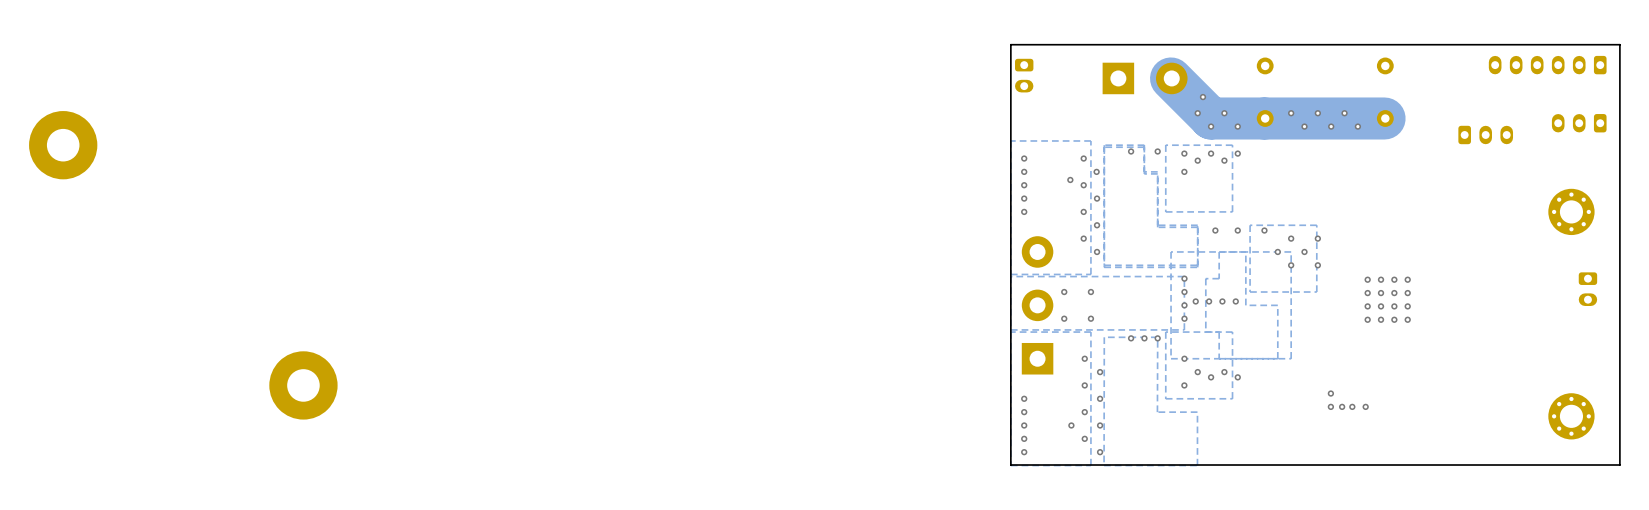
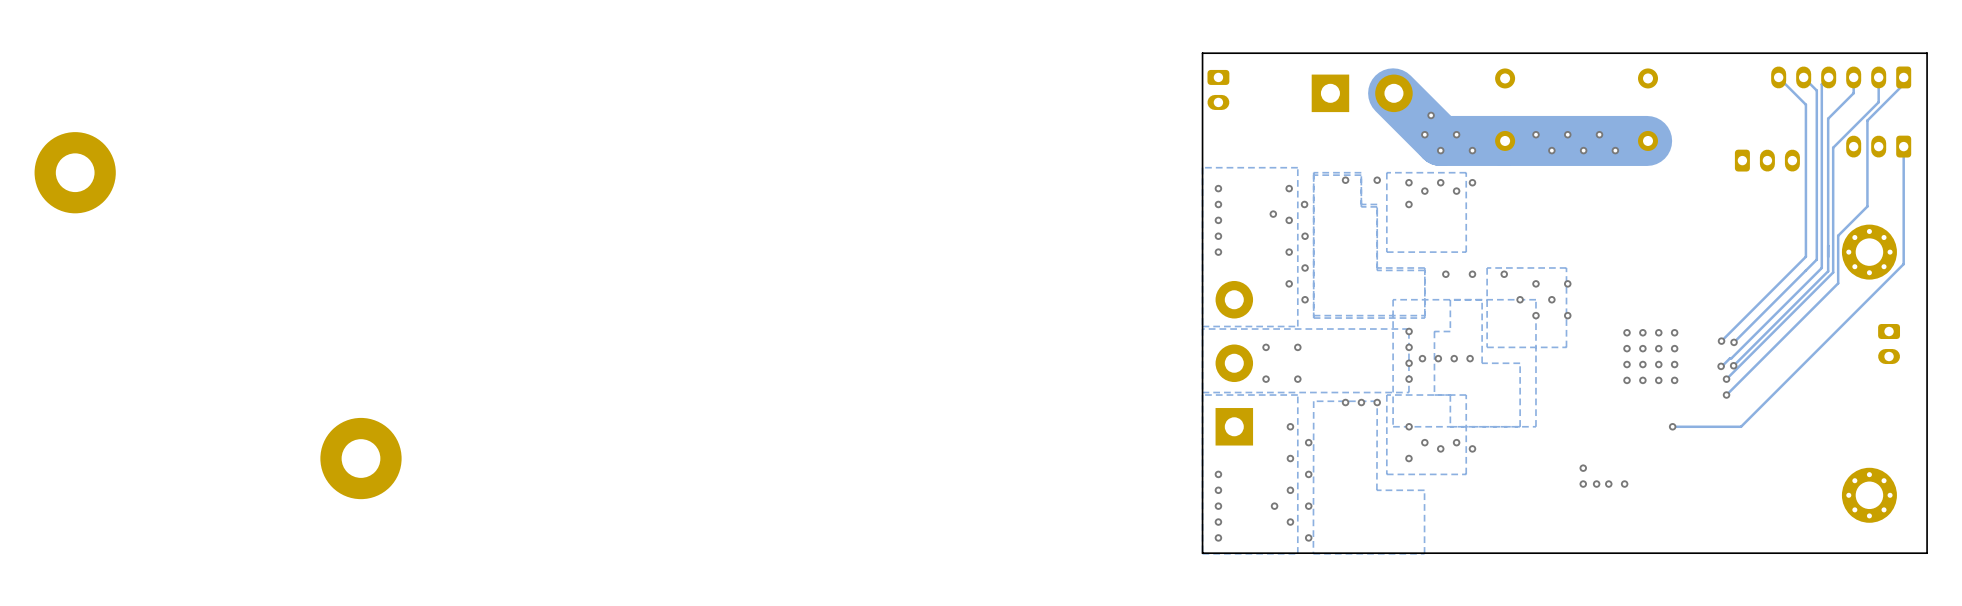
track: none -> (1778, 77) (1805, 104) (1805, 256) (1721, 341)
track: none -> (1803, 77) (1816, 90) (1816, 259) (1734, 342)
track: none -> (1828, 77) (1821, 84) (1821, 267) (1723, 366) (1721, 366)
track: none -> (1853, 77) (1853, 93) (1828, 118) (1828, 271) (1733, 365)
track: none -> (1878, 77) (1878, 102) (1833, 147) (1833, 272) (1726, 378)
track: none -> (1903, 77) (1903, 84) (1867, 120) (1867, 206) (1838, 235) (1838, 283) (1726, 395)
track: none -> (1903, 146) (1903, 264) (1741, 426) (1672, 426)
via: none -> (1721, 341)
via: none -> (1734, 342)
via: none -> (1721, 366)
via: none -> (1733, 365)
via: none -> (1726, 379)
via: none -> (1726, 395)
via: none -> (1672, 426)

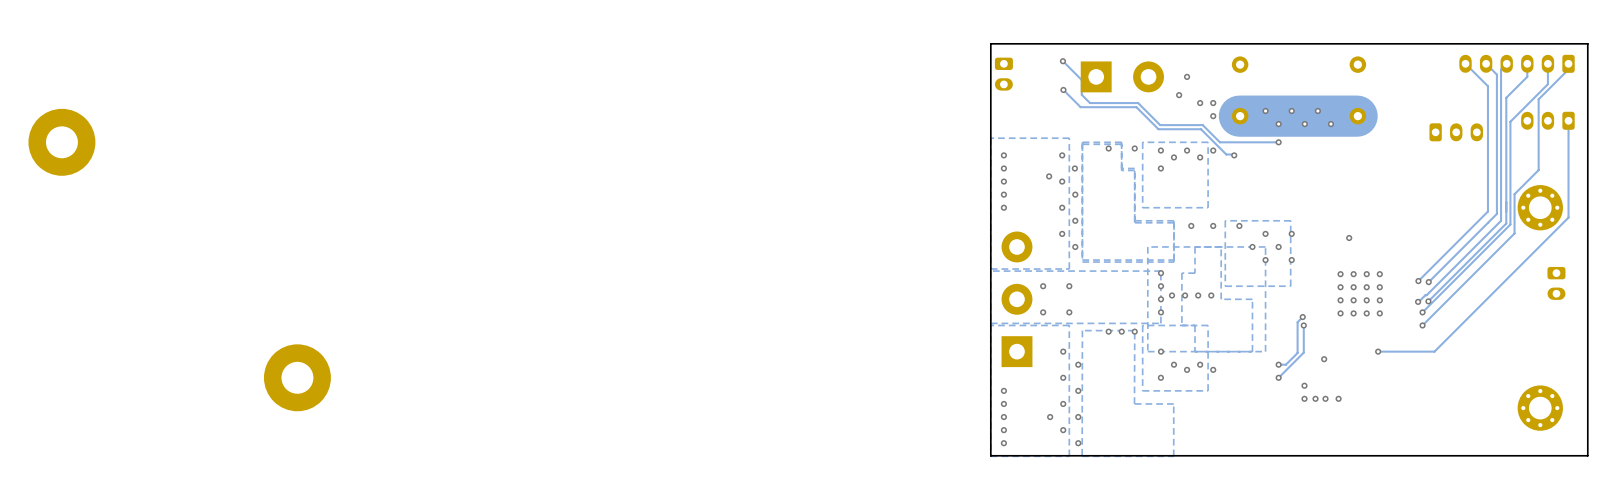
track: none -> (1062, 61) (1081, 80) (1081, 94) (1090, 103) (1138, 103) (1160, 125) (1202, 125) (1219, 142) (1278, 142)
via: none -> (1062, 61)
track: (1393, 93) (1440, 140) (1504, 140) -> none
via: none -> (1187, 76)
track: none -> (1063, 89) (1080, 107) (1136, 107) (1158, 129) (1201, 129) (1226, 154) (1234, 155)
via: none -> (1063, 89)
via: none -> (1200, 103)
via: none -> (1213, 103)
via: (1424, 134) -> none
via: (1456, 134) -> none
via: none -> (1213, 116)
via: (1440, 150) -> none
via: (1472, 150) -> none
via: none -> (1278, 142)
via: none -> (1234, 155)
via: none -> (1349, 238)
track: none -> (1302, 317) (1297, 322) (1297, 353) (1285, 364) (1278, 364)
via: none -> (1302, 317)
track: none -> (1303, 325) (1303, 352) (1278, 377)
via: none -> (1303, 325)
via: none -> (1324, 359)
via: none -> (1278, 364)
via: none -> (1278, 377)

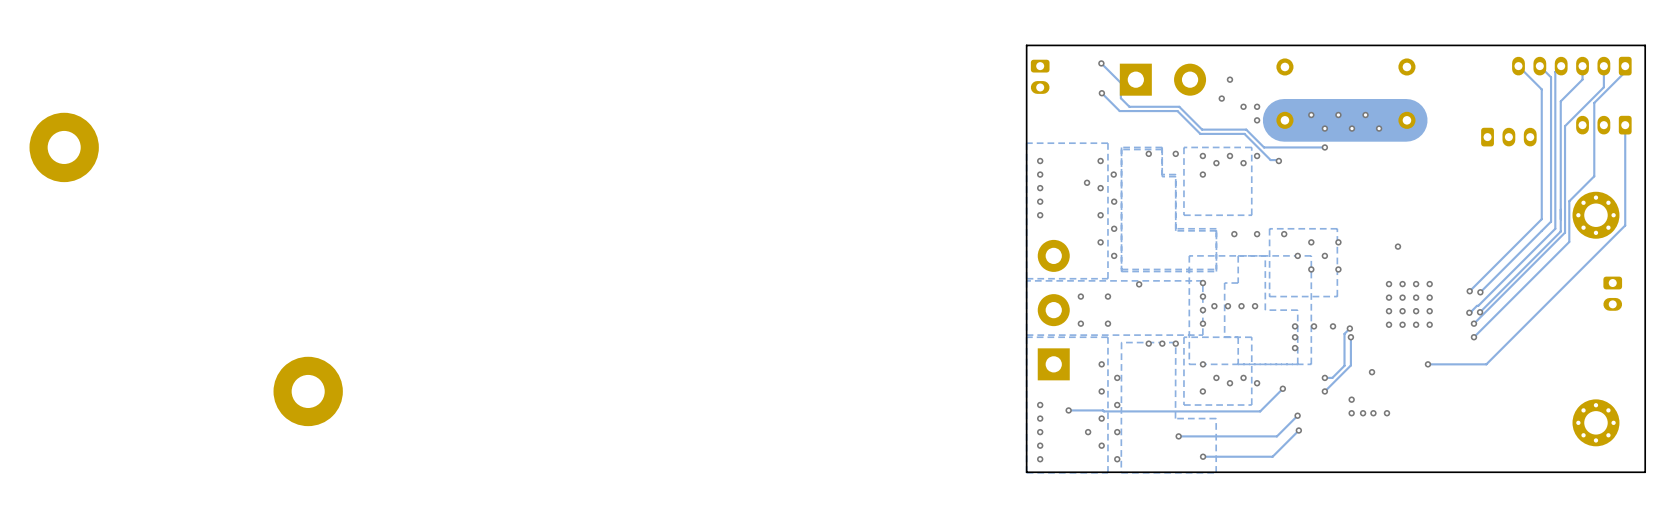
via: none -> (1139, 284)
via: none -> (1295, 326)
via: none -> (1314, 326)
via: none -> (1333, 326)
via: none -> (1295, 337)
via: none -> (1295, 348)
track: none -> (1282, 388) (1260, 411) (1068, 410)
via: none -> (1282, 388)
via: none -> (1068, 410)
track: none -> (1297, 415) (1276, 436) (1178, 436)
via: none -> (1297, 415)
track: none -> (1298, 430) (1272, 456) (1203, 456)
via: none -> (1298, 430)
via: none -> (1178, 436)
via: none -> (1203, 456)

